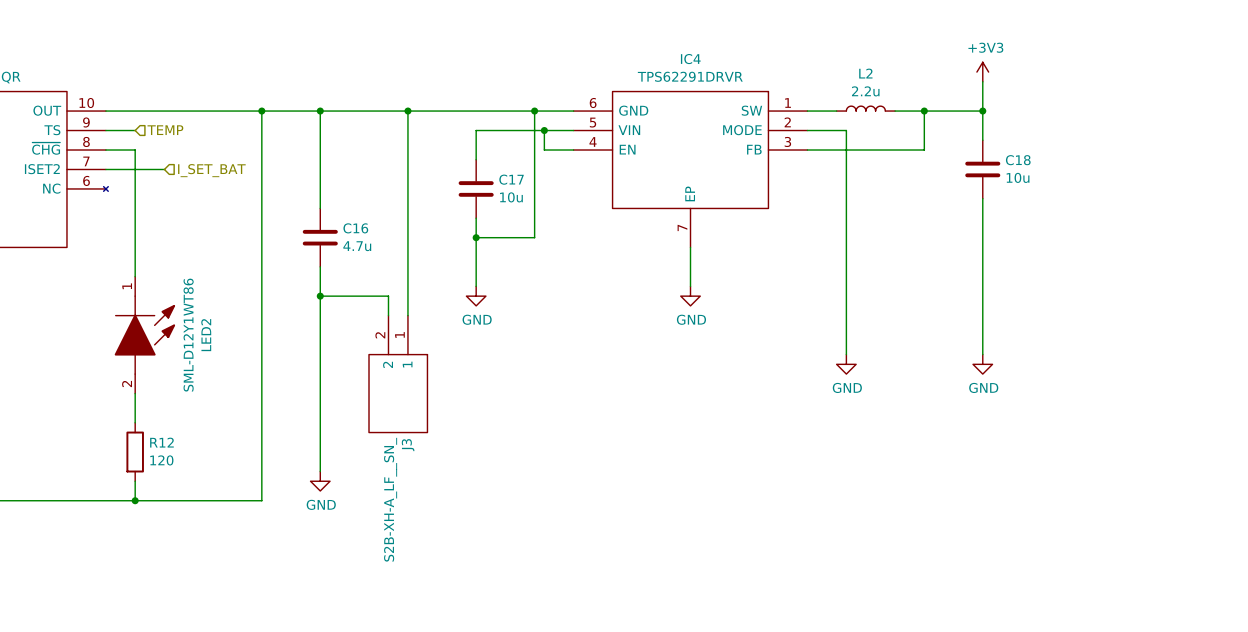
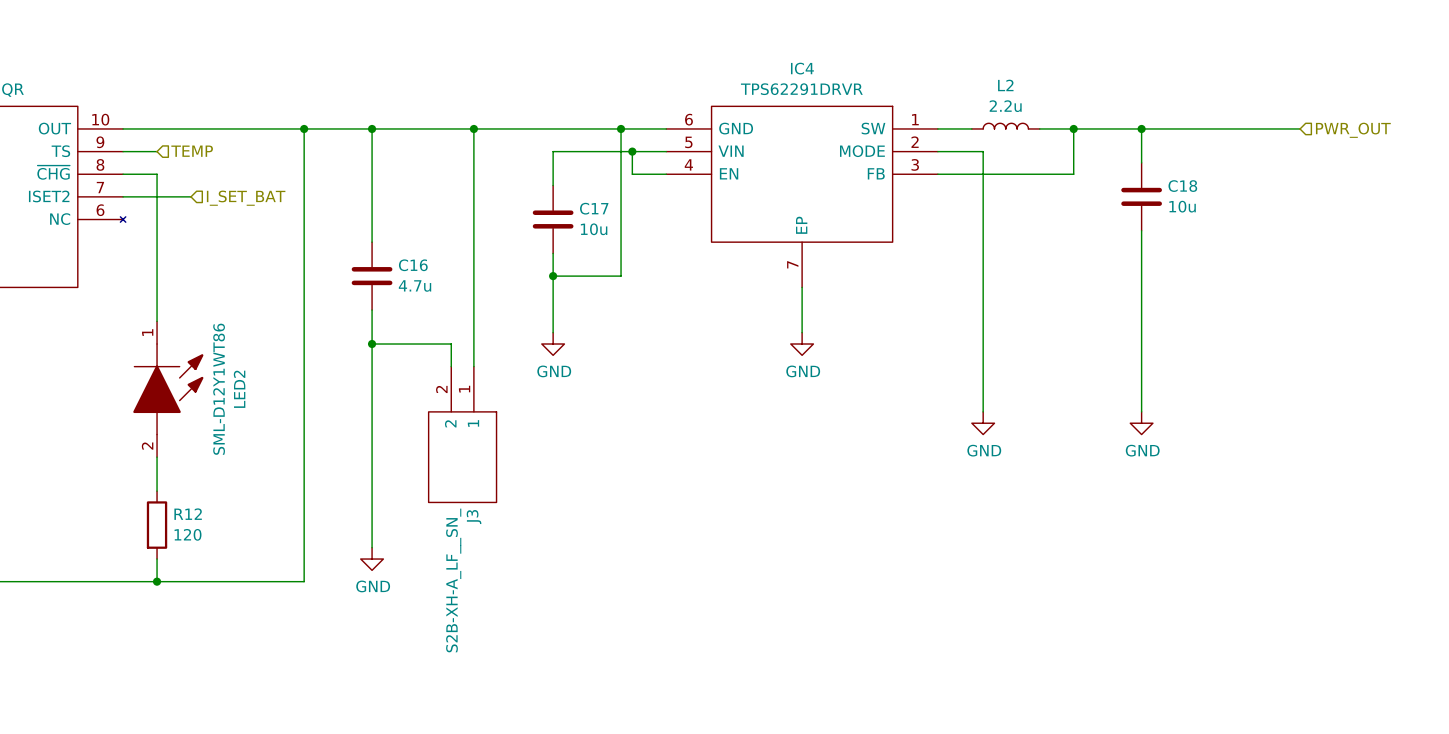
power symbol: +3V3 (982, 72) -> none
wire: (982, 81) (982, 111) -> (1300, 128) (1141, 128)
hierarchical label: none -> PWR_OUT (1353, 130)

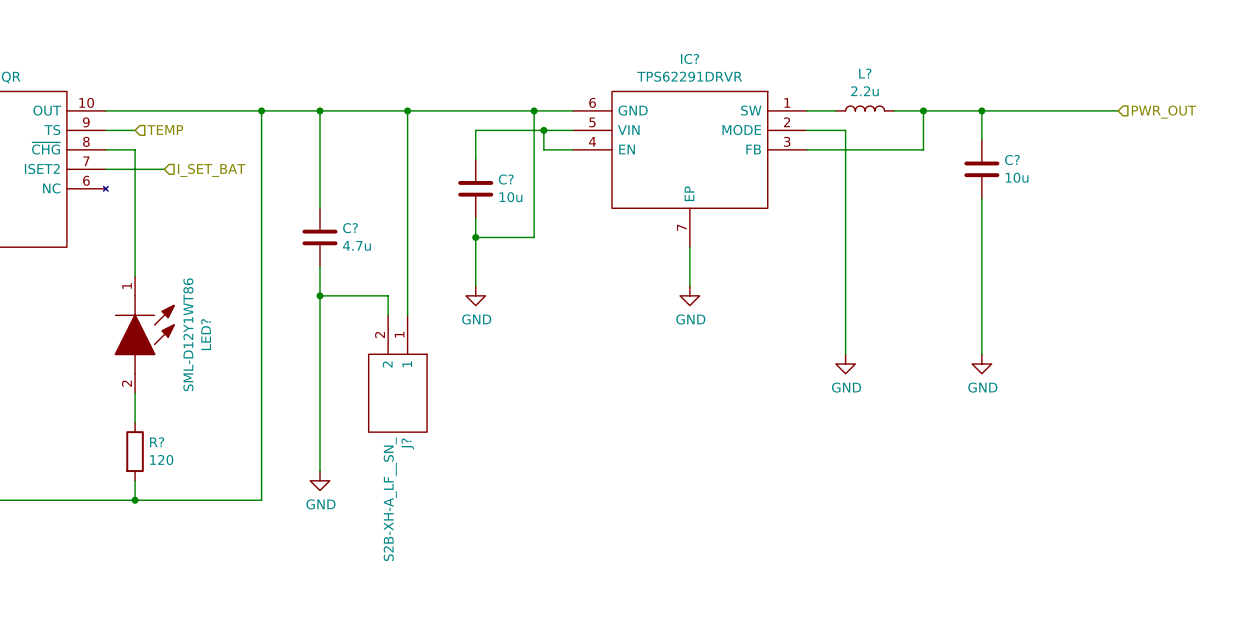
IC4 name: IC4 (802, 68) -> IC? (690, 58)
L2 name: L2 (1005, 85) -> L? (865, 73)
C18 name: C18 (1182, 186) -> C? (1012, 160)
C17 name: C17 (594, 208) -> C? (506, 179)
C16 name: C16 (413, 265) -> C? (350, 228)
LED2 name: LED2 (239, 389) -> LED? (206, 334)
R12 name: R12 (188, 514) -> R? (157, 442)
J3 name: J3 (474, 517) -> J? (407, 443)

